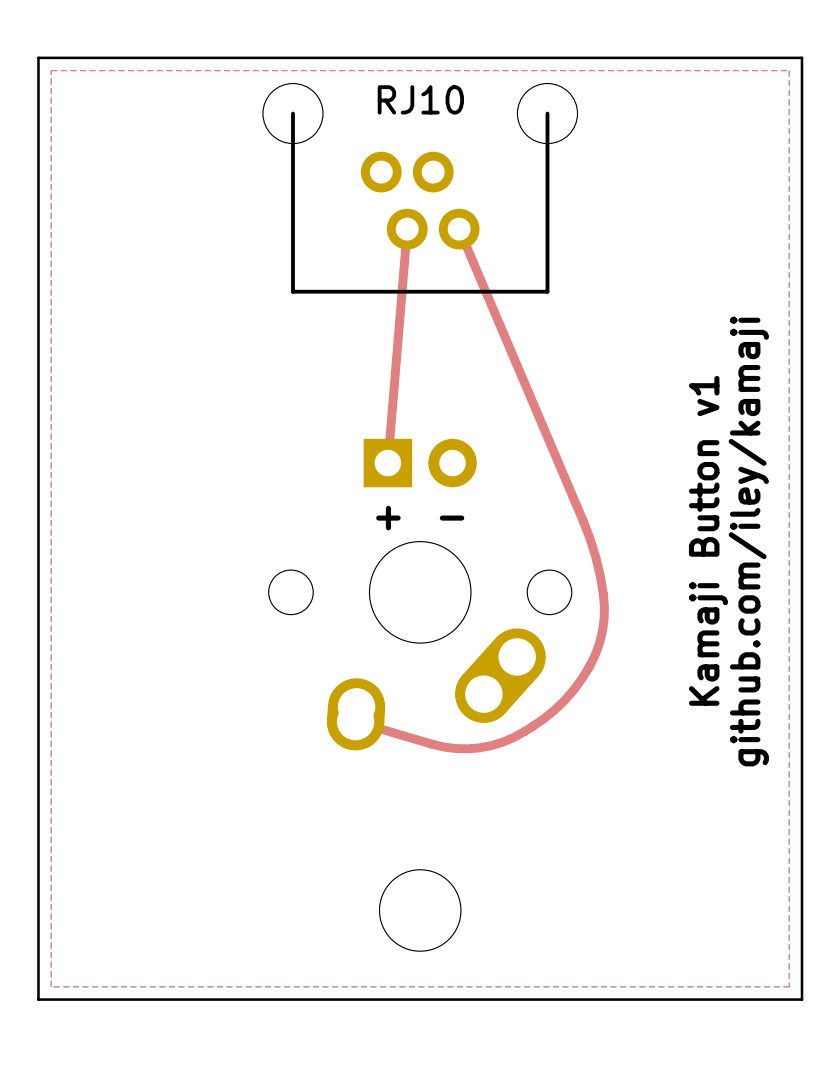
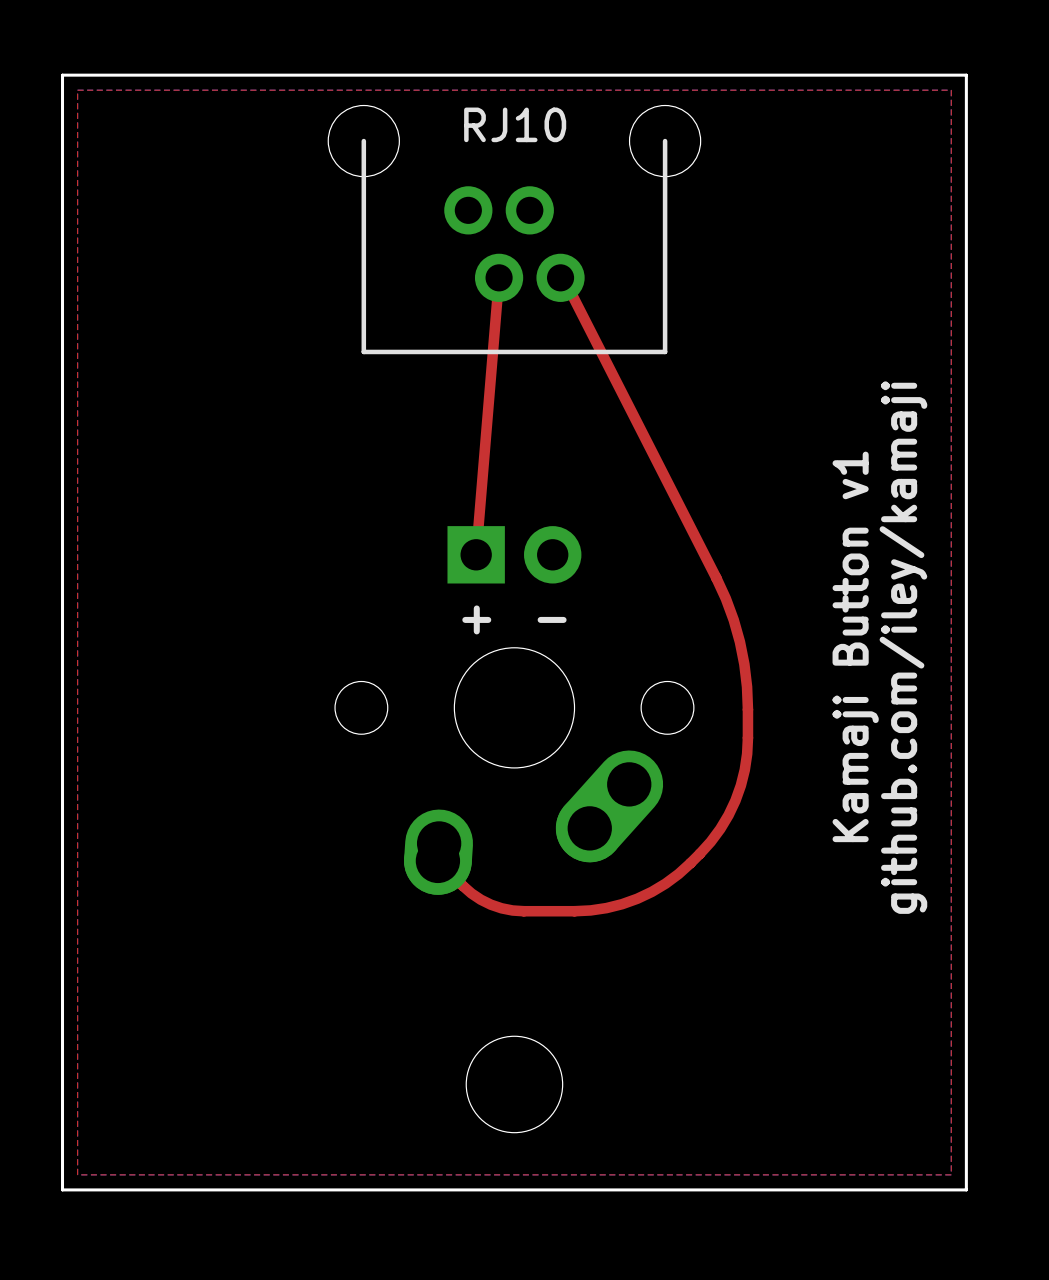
top track: (459, 229) (590, 539) (603, 594) (602, 631) (589, 666) (564, 700) (533, 726) (503, 742) (479, 747) (443, 747) (355, 721) -> (560, 272) (725, 598) (739, 641) (747, 686) (747, 737) (744, 769) (735, 800) (728, 815) (720, 828) (699, 853) (665, 883) (651, 891) (622, 904) (606, 908) (574, 911) (523, 911) (501, 908) (471, 893) (437, 860)

